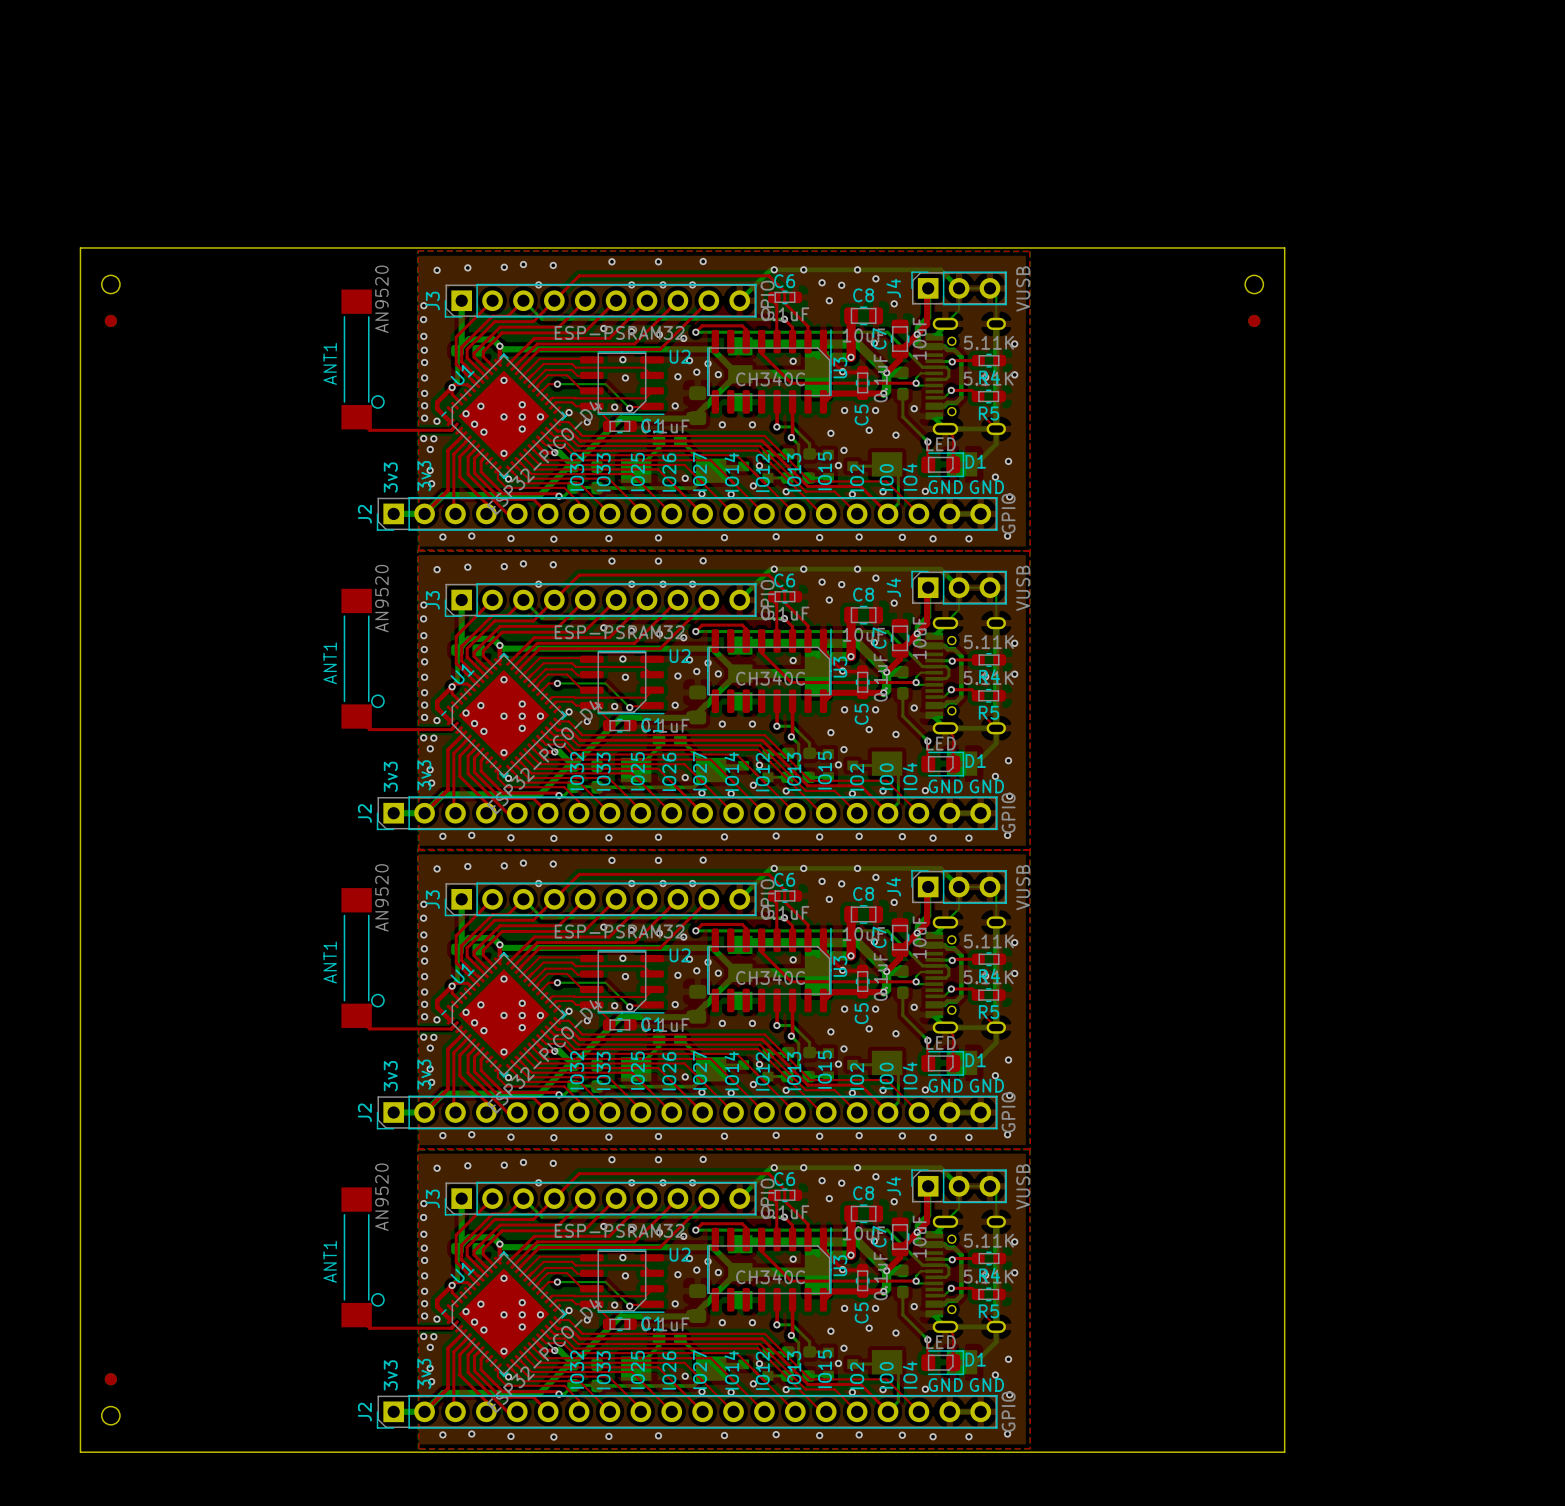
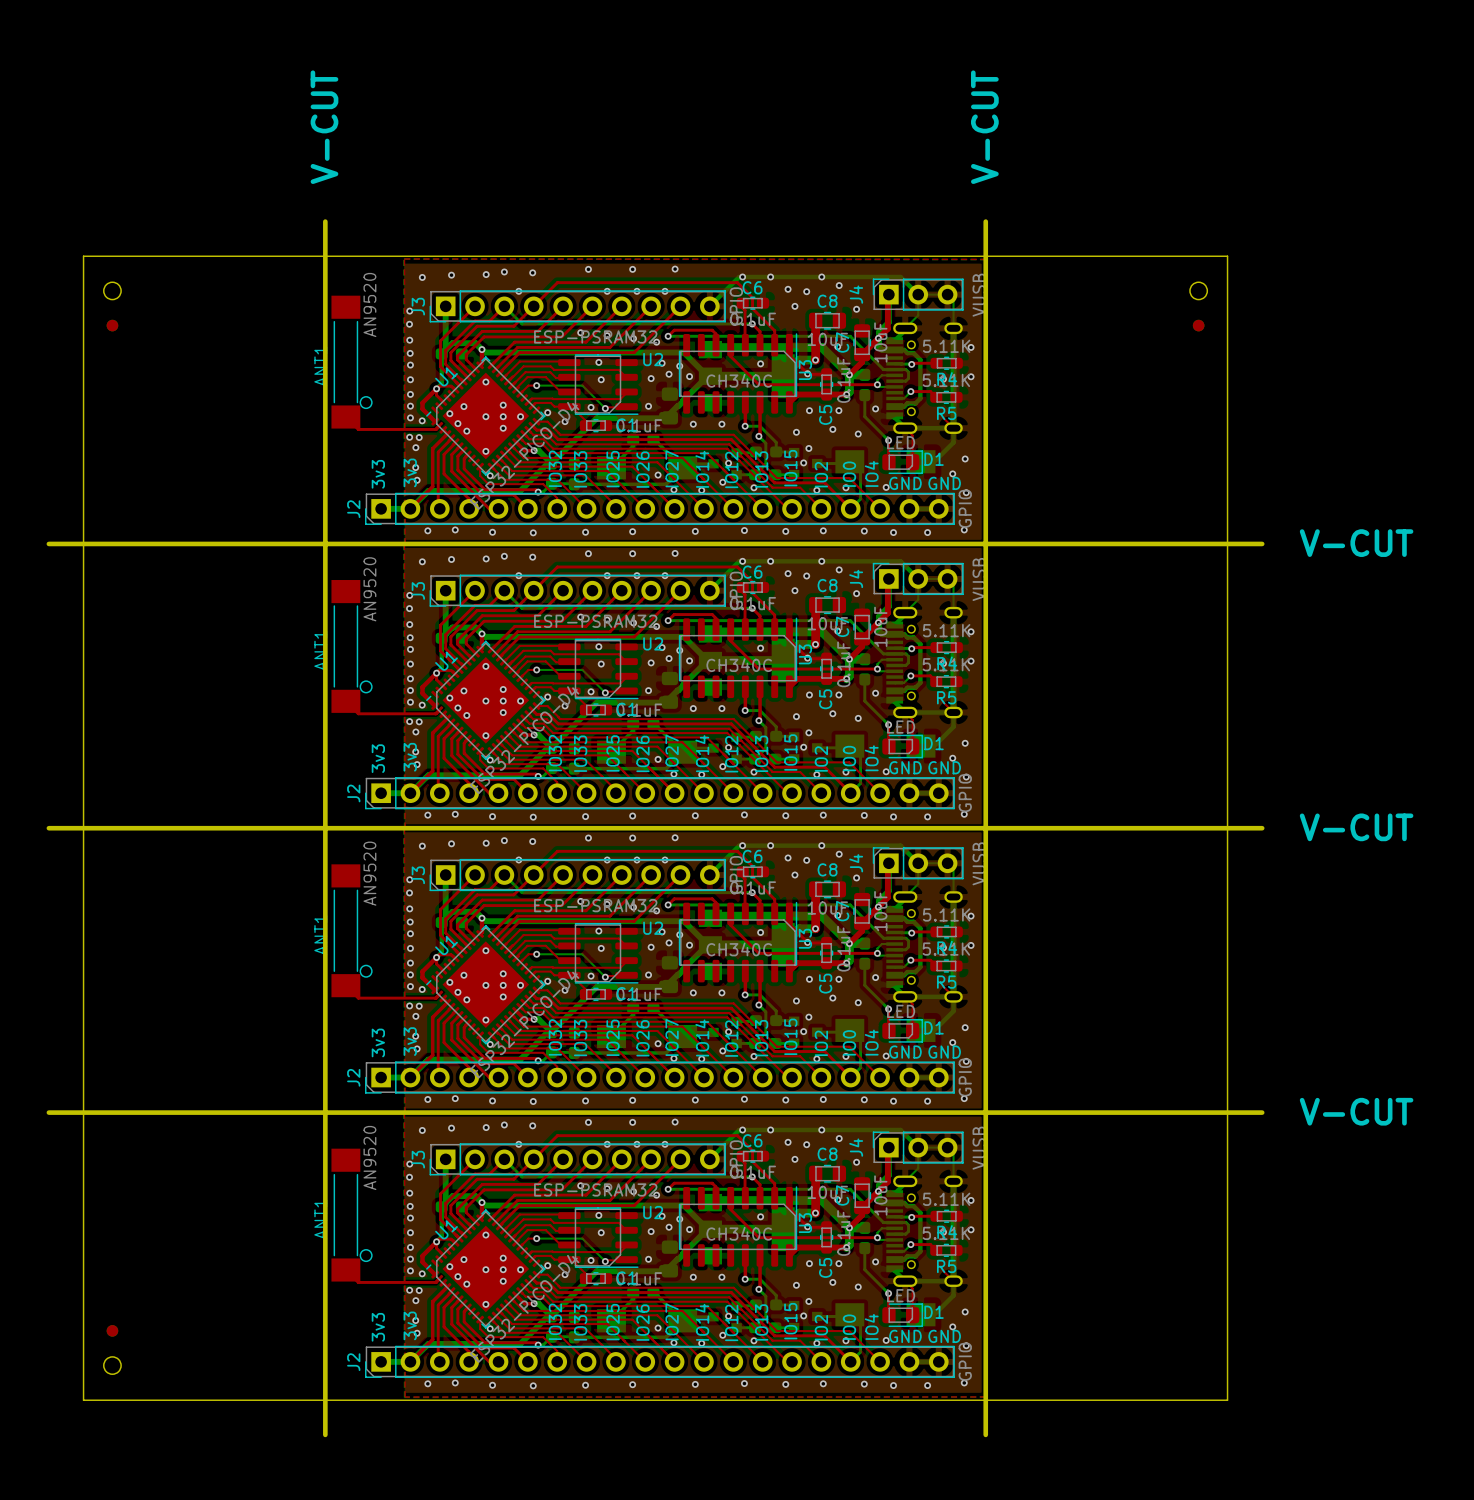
text: none -> V-CUT (324, 127)
text: none -> V-CUT (984, 127)
board edge: none -> (325, 221) (325, 1434)
board edge: none -> (985, 221) (985, 1434)
text: none -> V-CUT (1356, 543)
board edge: none -> (48, 543) (1262, 543)
text: none -> V-CUT (1356, 827)
board edge: none -> (48, 828) (1262, 828)
text: none -> V-CUT (1356, 1111)
board edge: none -> (48, 1112) (1262, 1112)

